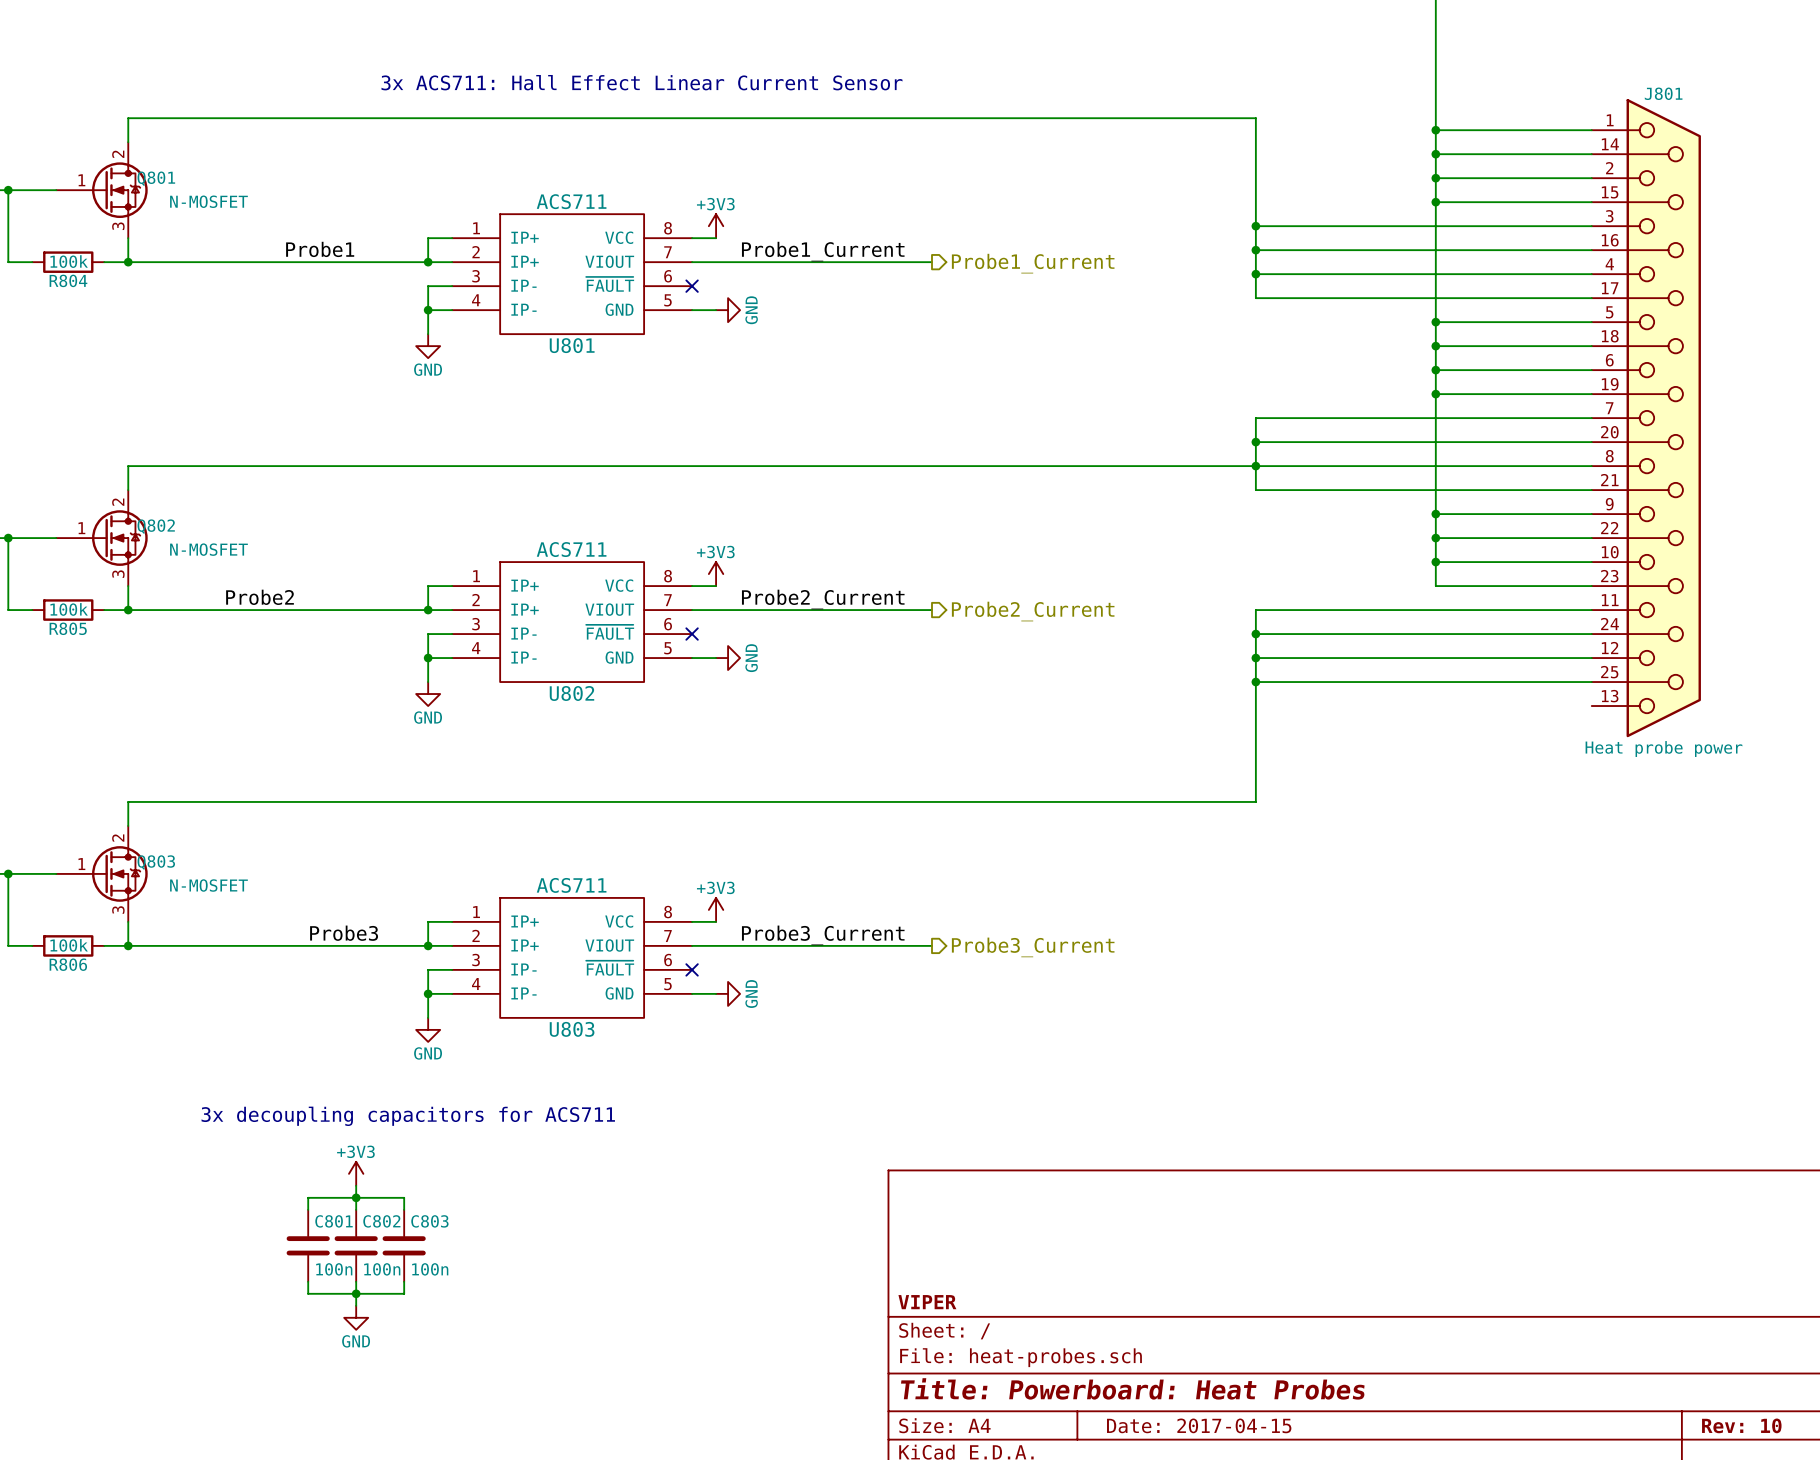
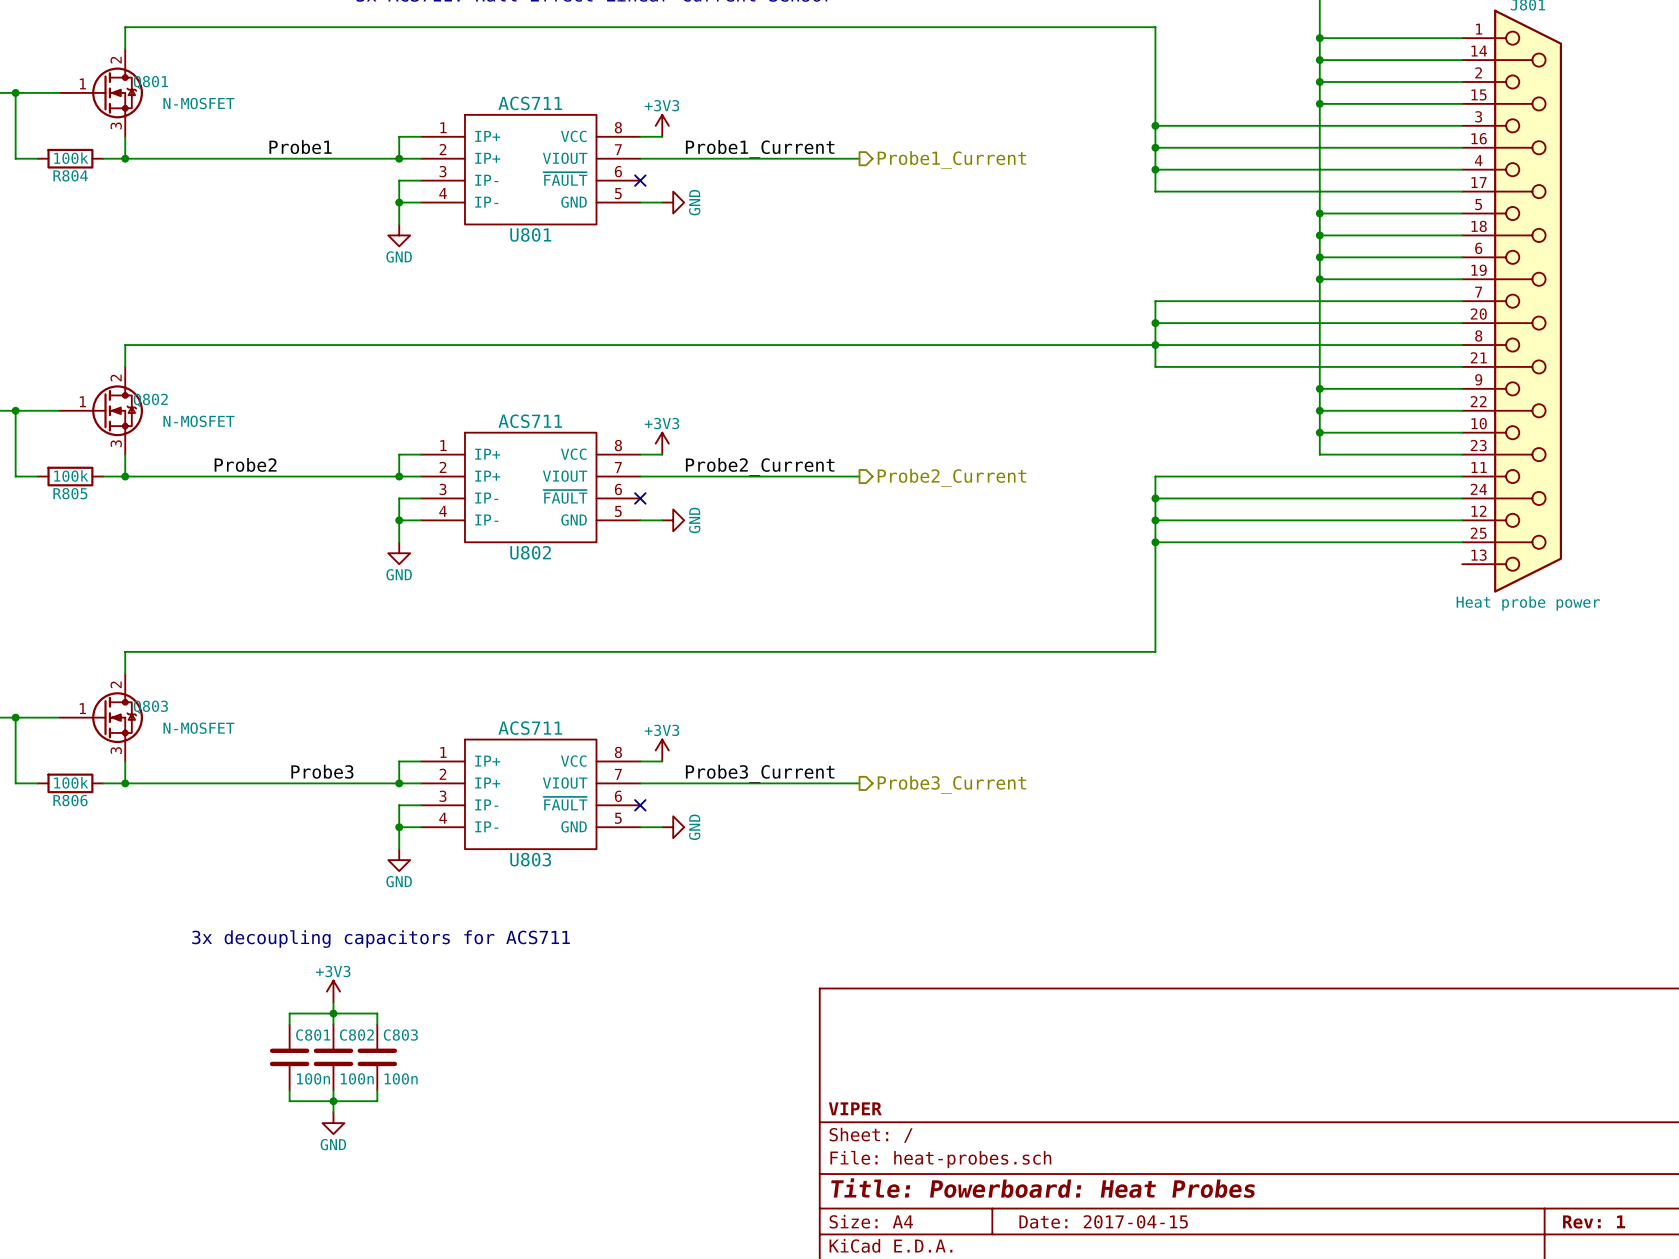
title block: Rev: 10 (1741, 1425) -> Rev: 1 (1594, 1221)

